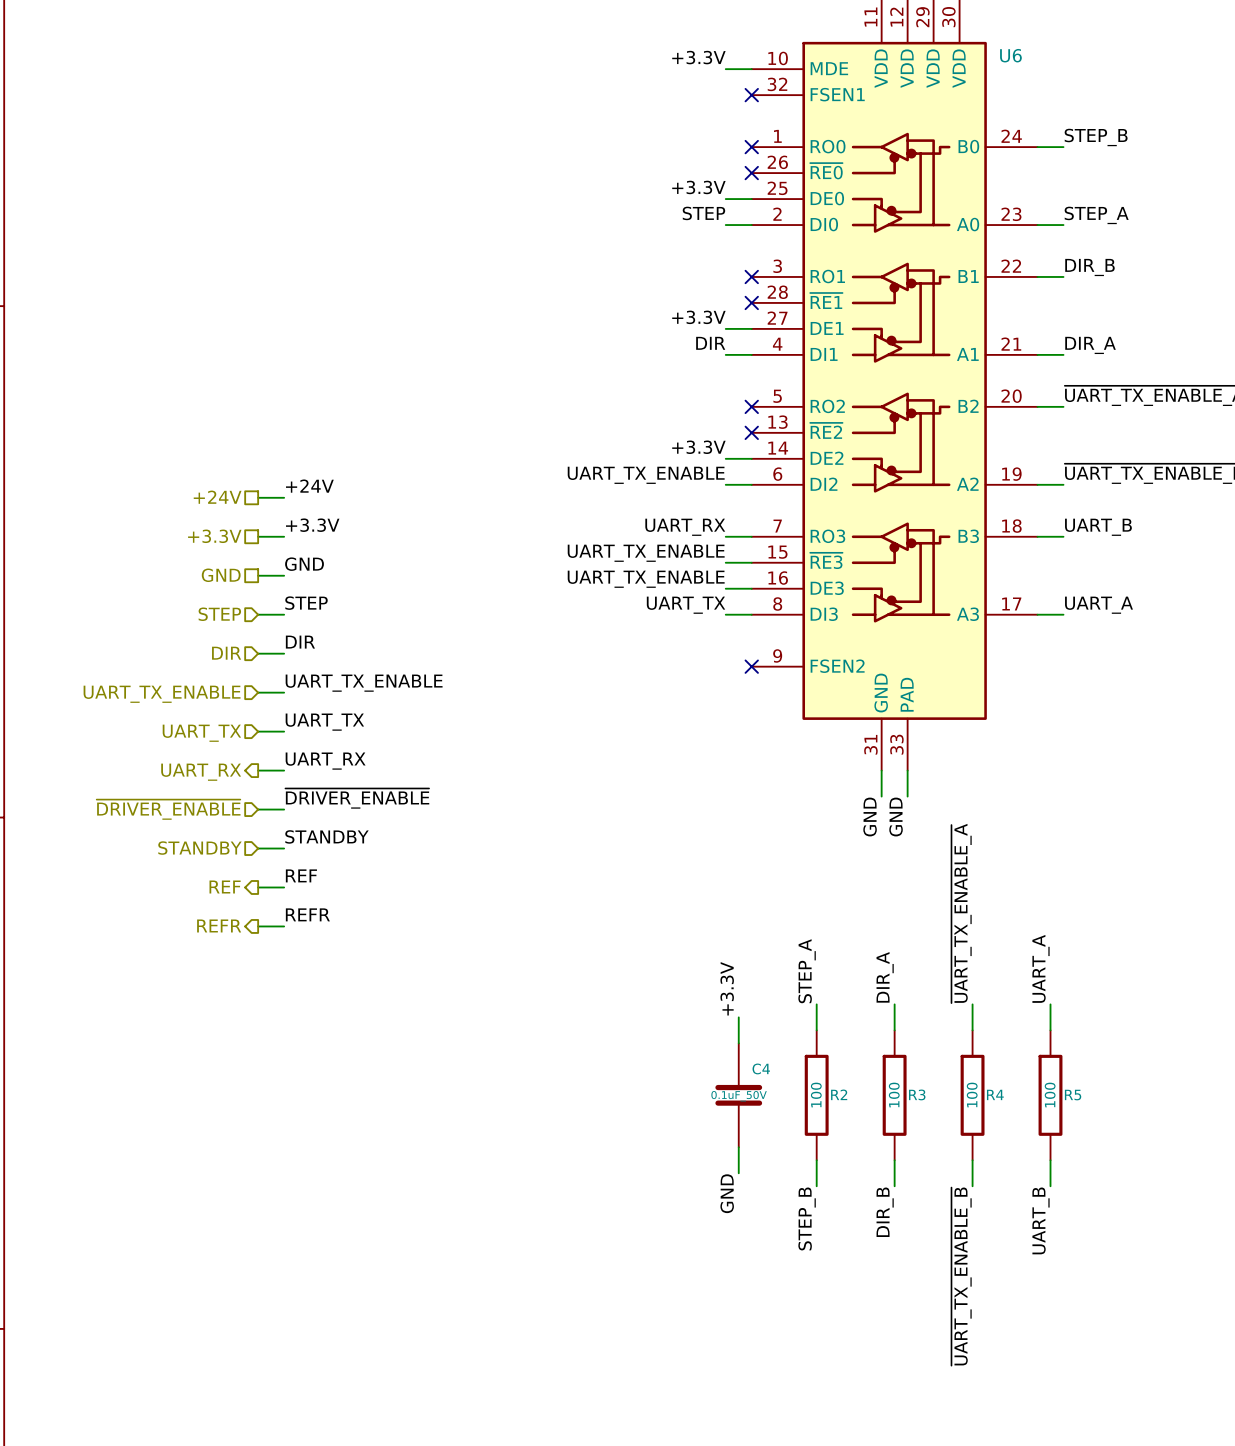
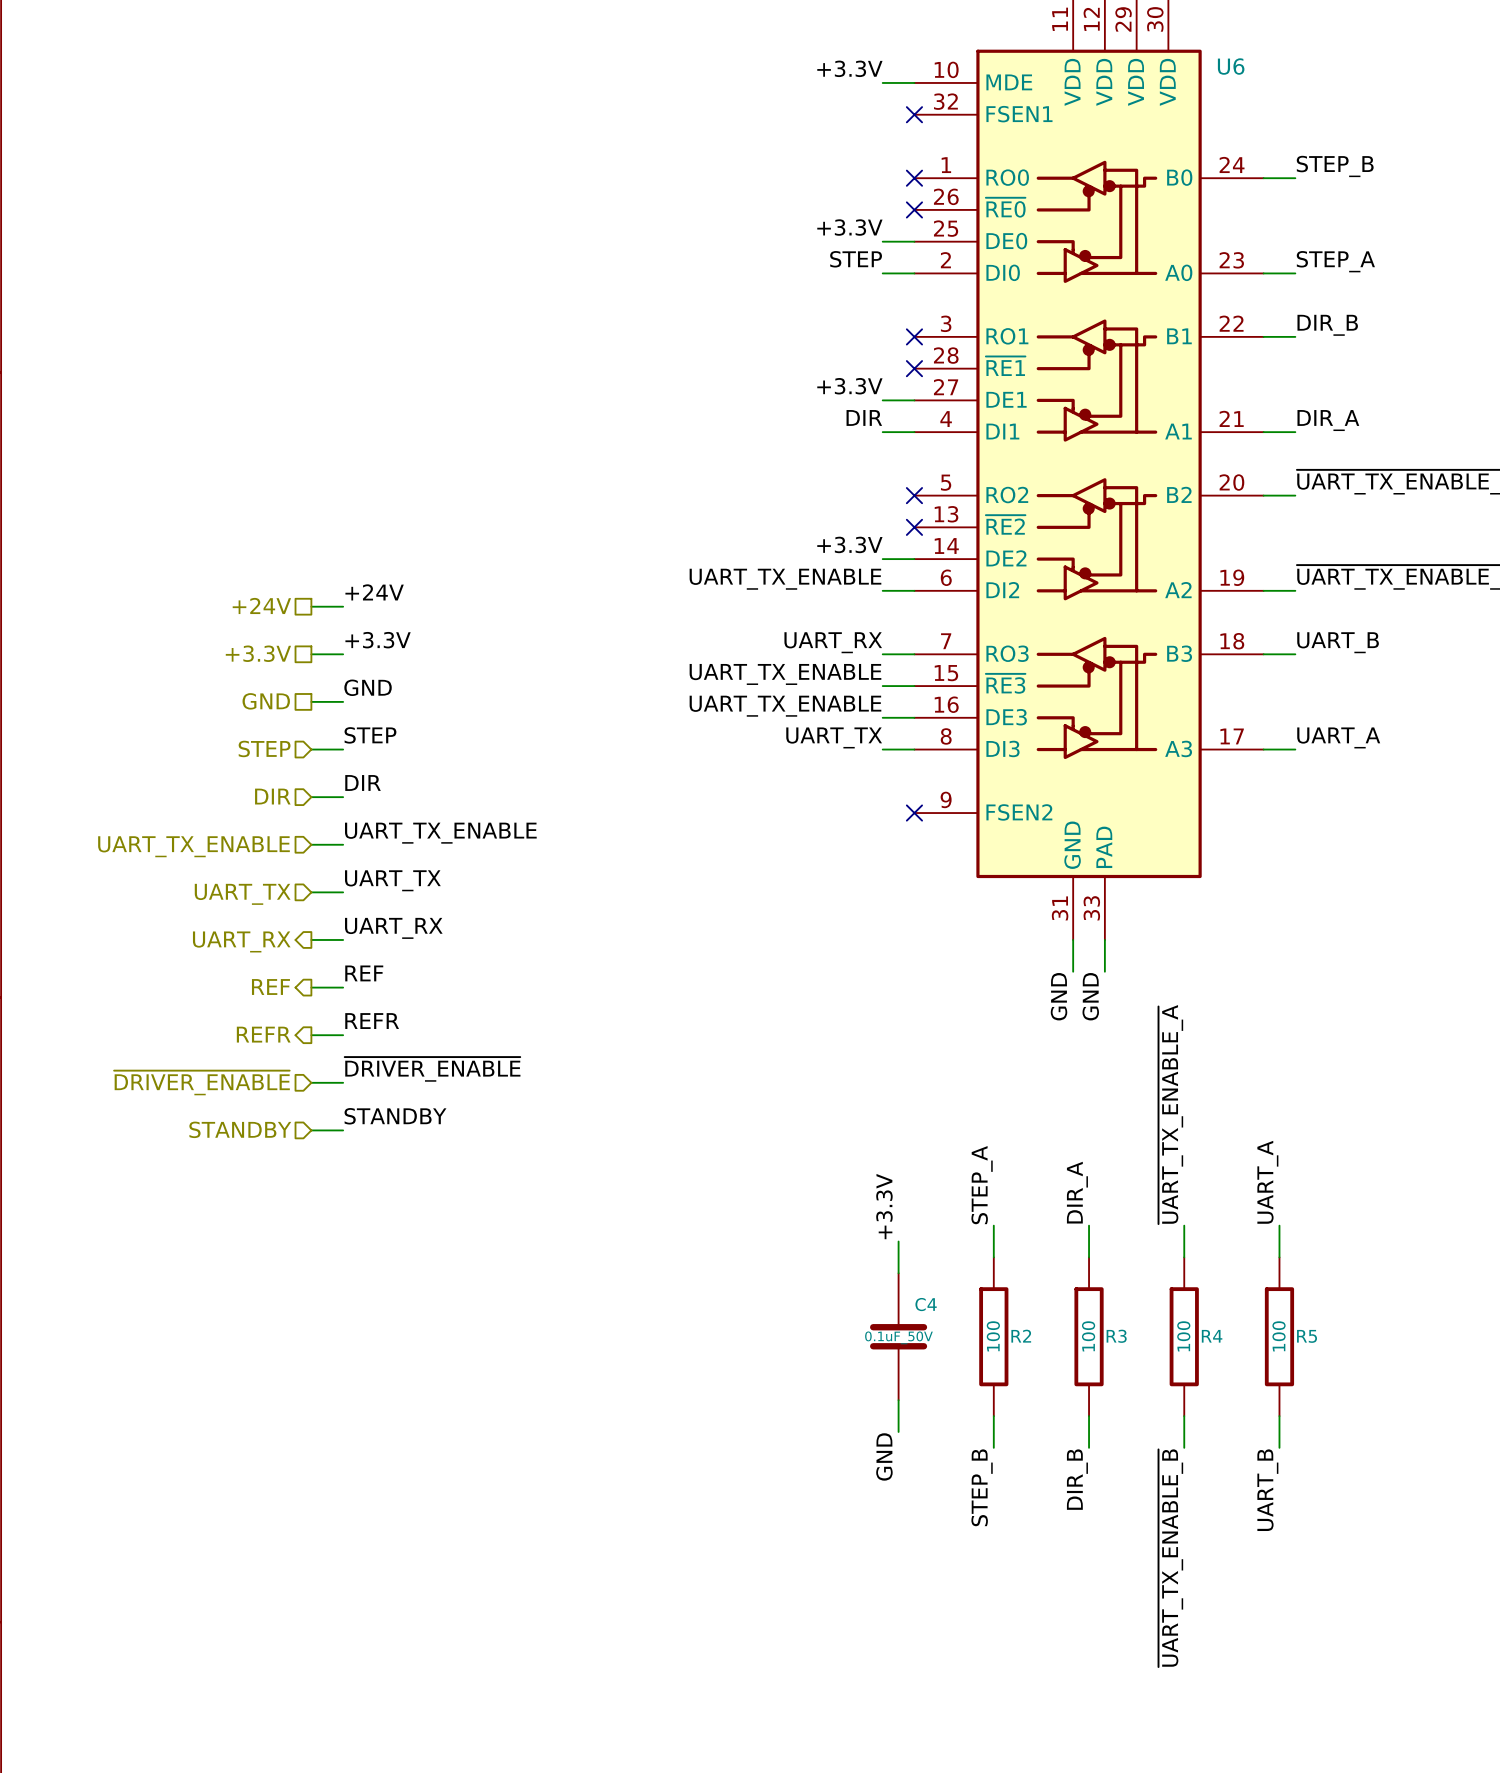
label: ~{DRIVER_ENABLE} (357, 798) -> REF (364, 973)
hierarchical label shape: input (168, 809) -> output (270, 987)
hierarchical label: ~{DRIVER_ENABLE} (168, 809) -> REF (270, 987)
label: STANDBY (326, 836) -> REFR (372, 1021)
hierarchical label shape: input (199, 848) -> output (263, 1034)
hierarchical label: STANDBY (199, 848) -> REFR (263, 1034)
label: REF (301, 875) -> ~{DRIVER_ENABLE} (432, 1069)
hierarchical label shape: output (225, 887) -> input (201, 1082)
hierarchical label: REF (225, 887) -> ~{DRIVER_ENABLE} (201, 1082)
label: REFR (307, 914) -> STANDBY (395, 1116)
hierarchical label shape: output (219, 925) -> input (240, 1129)
hierarchical label: REFR (219, 925) -> STANDBY (240, 1129)

